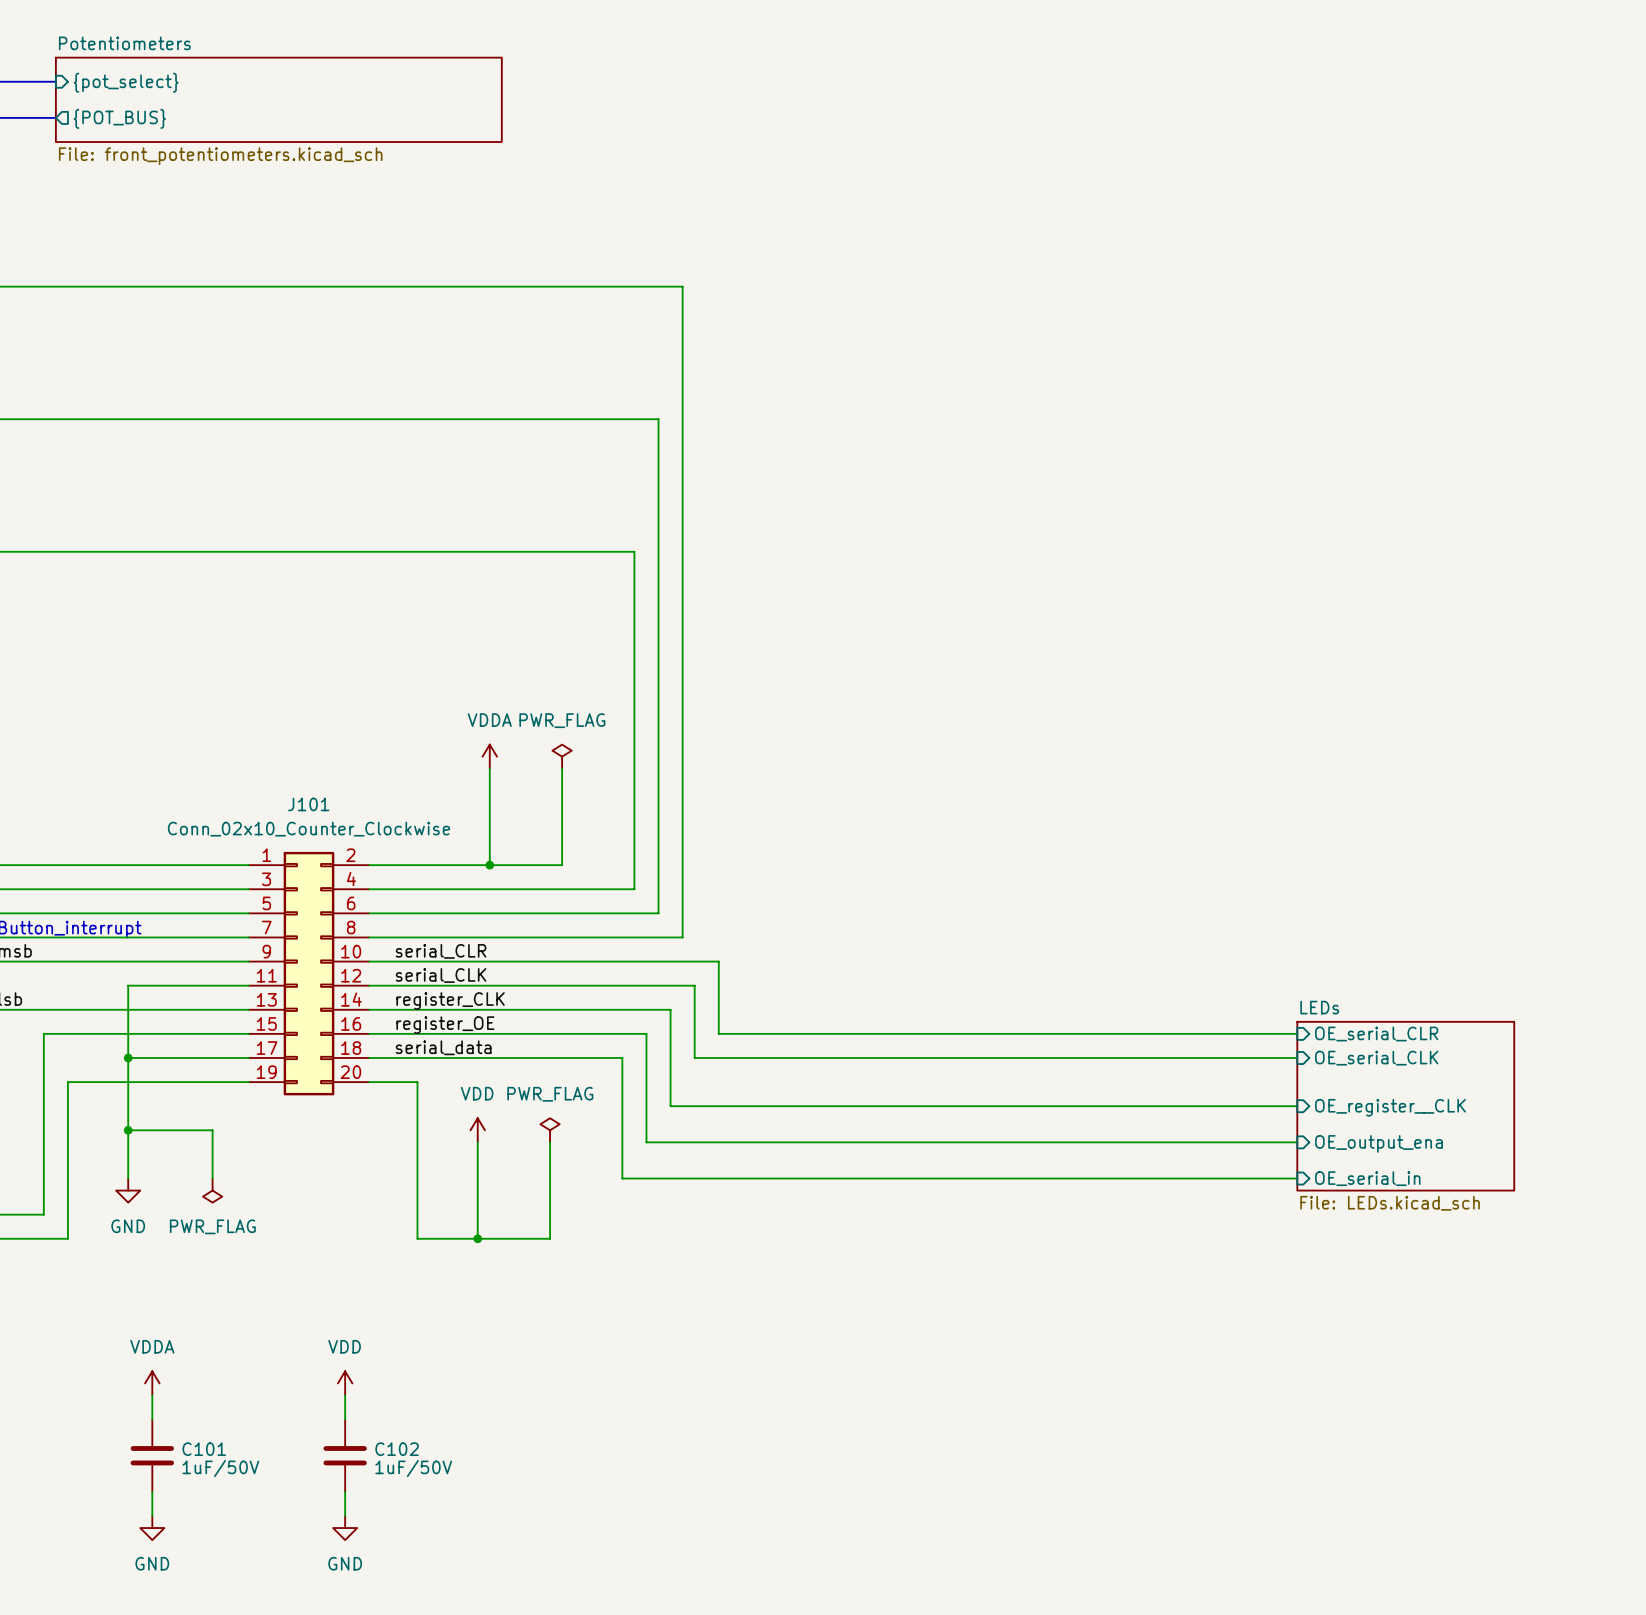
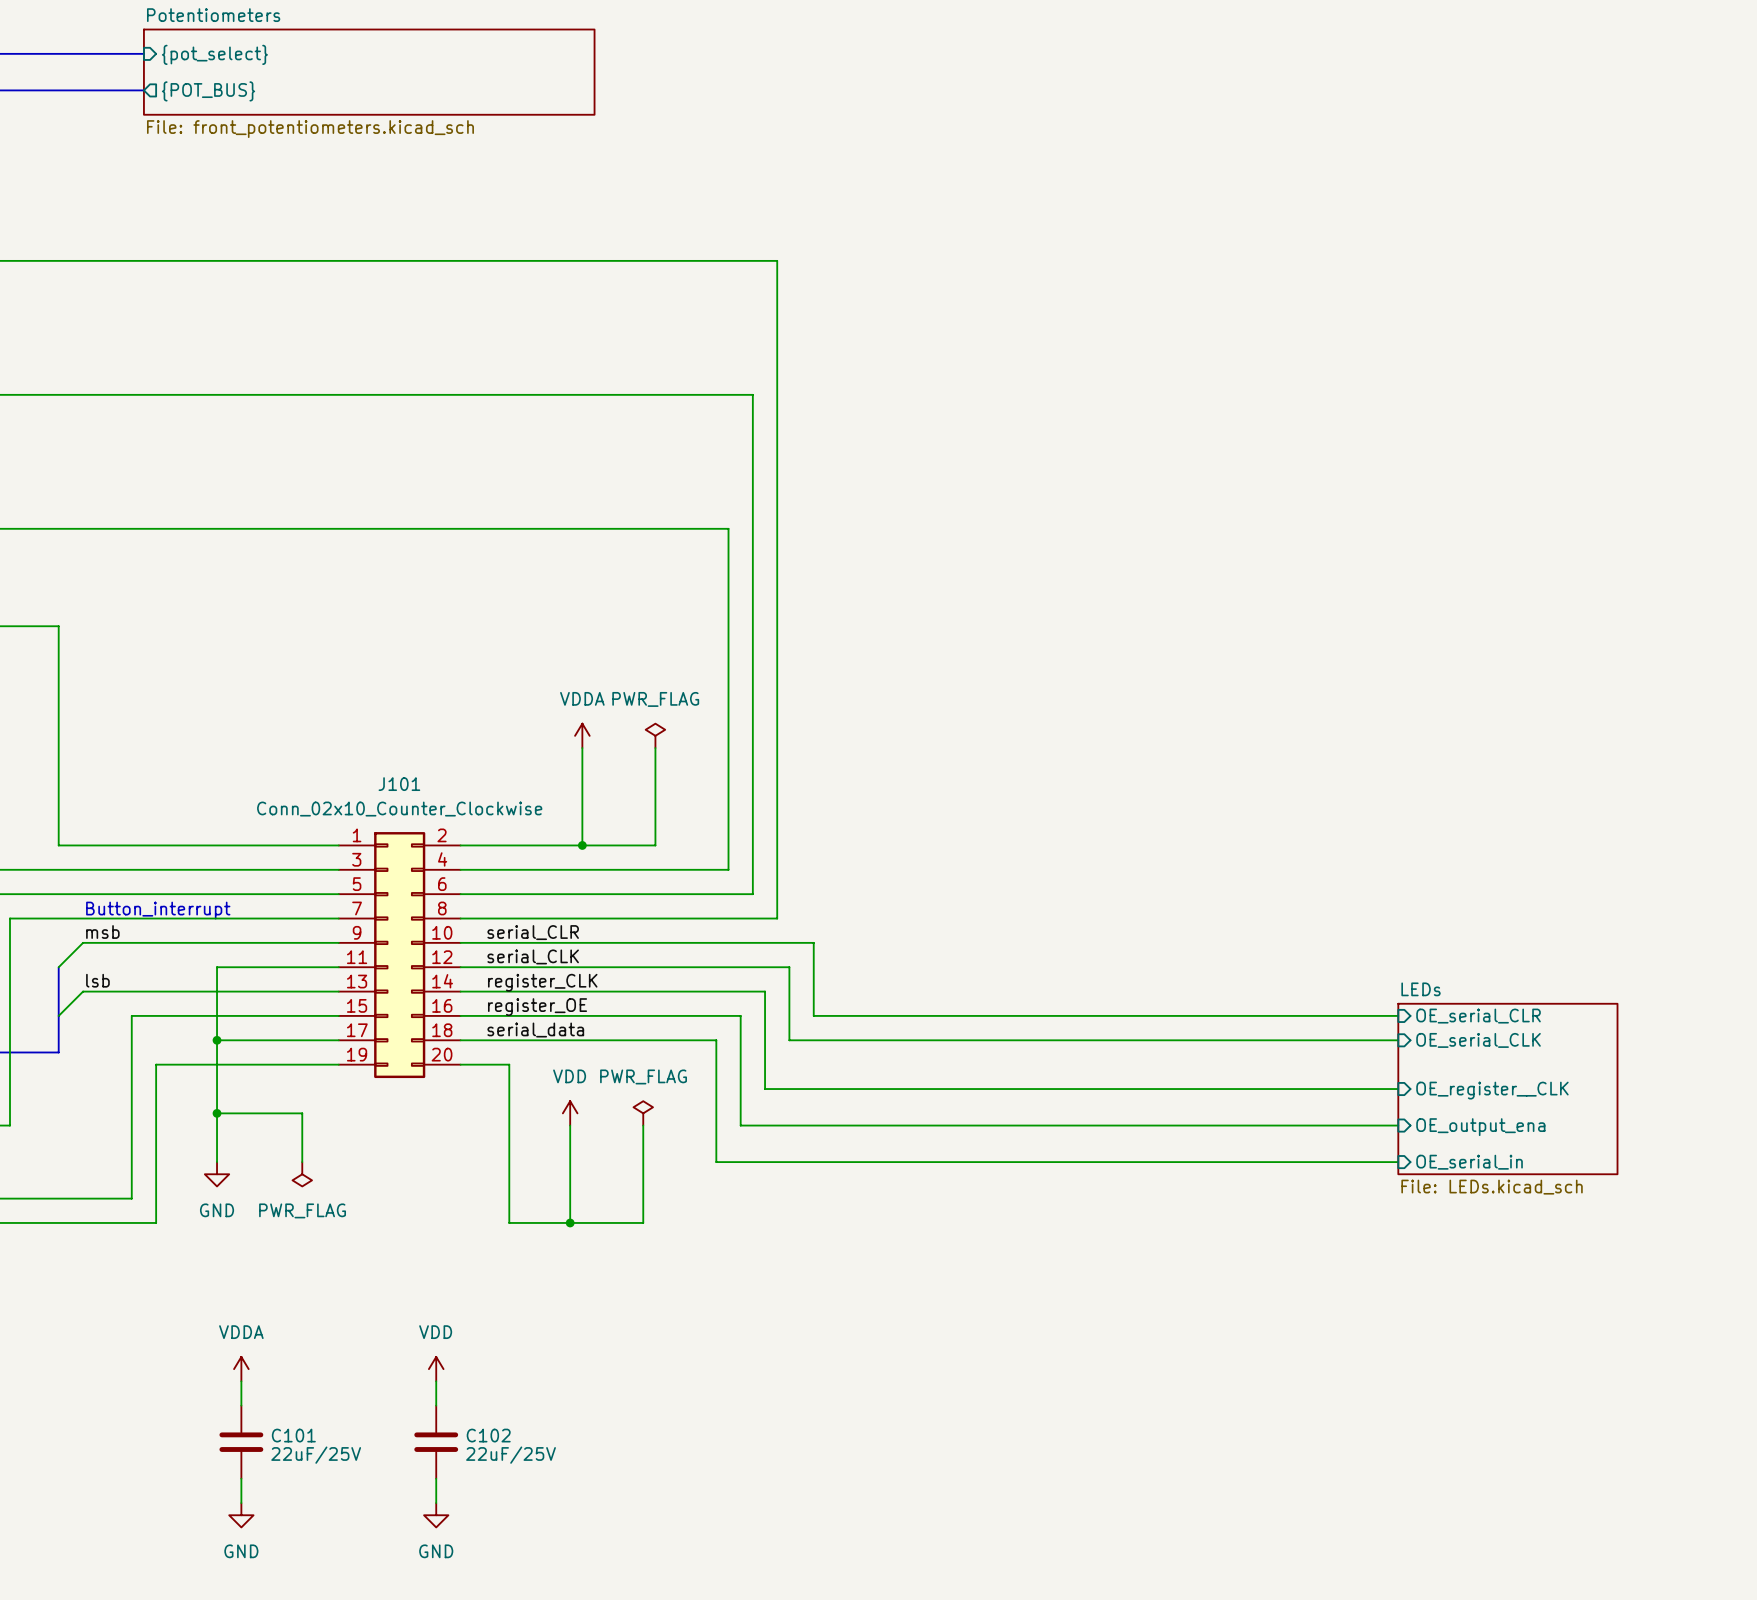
C101 value: 1uF/50V (220, 1468) -> 22uF/25V (316, 1455)
C102 value: 1uF/50V (413, 1468) -> 22uF/25V (511, 1455)

